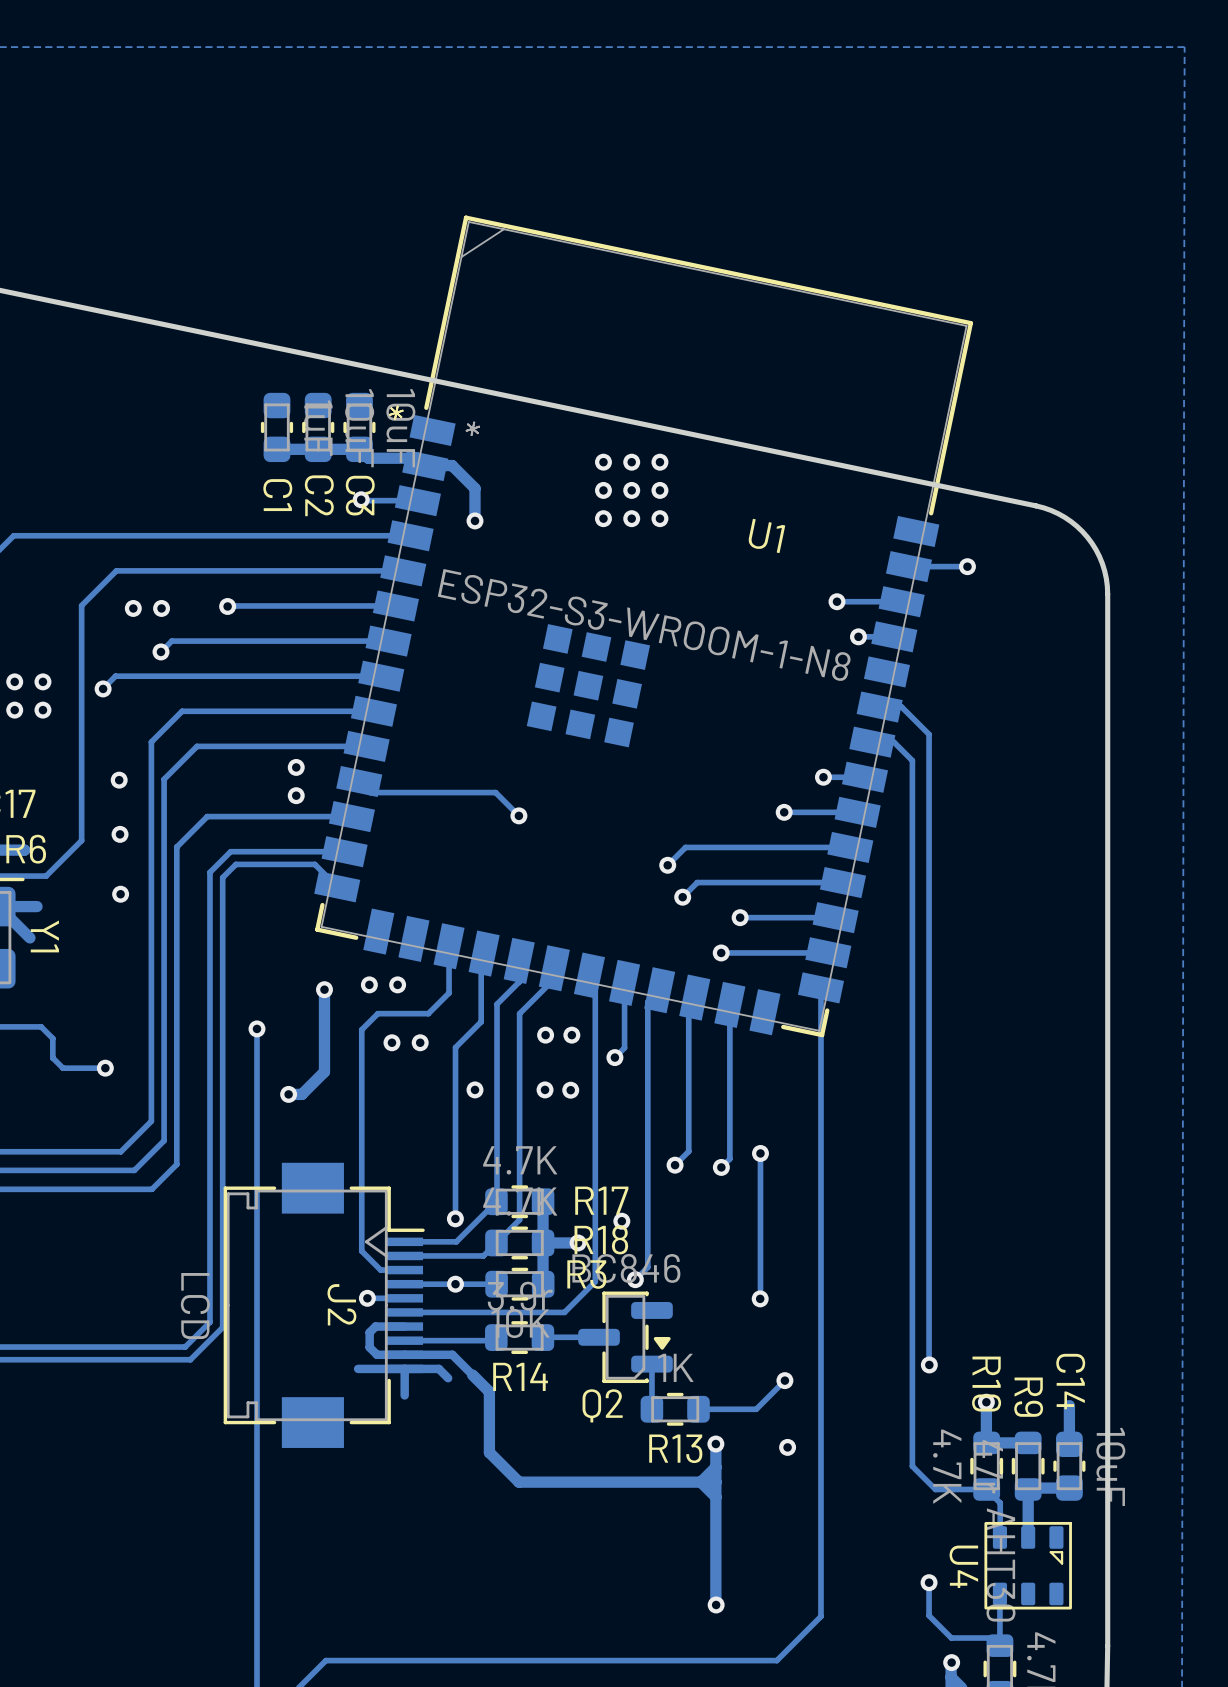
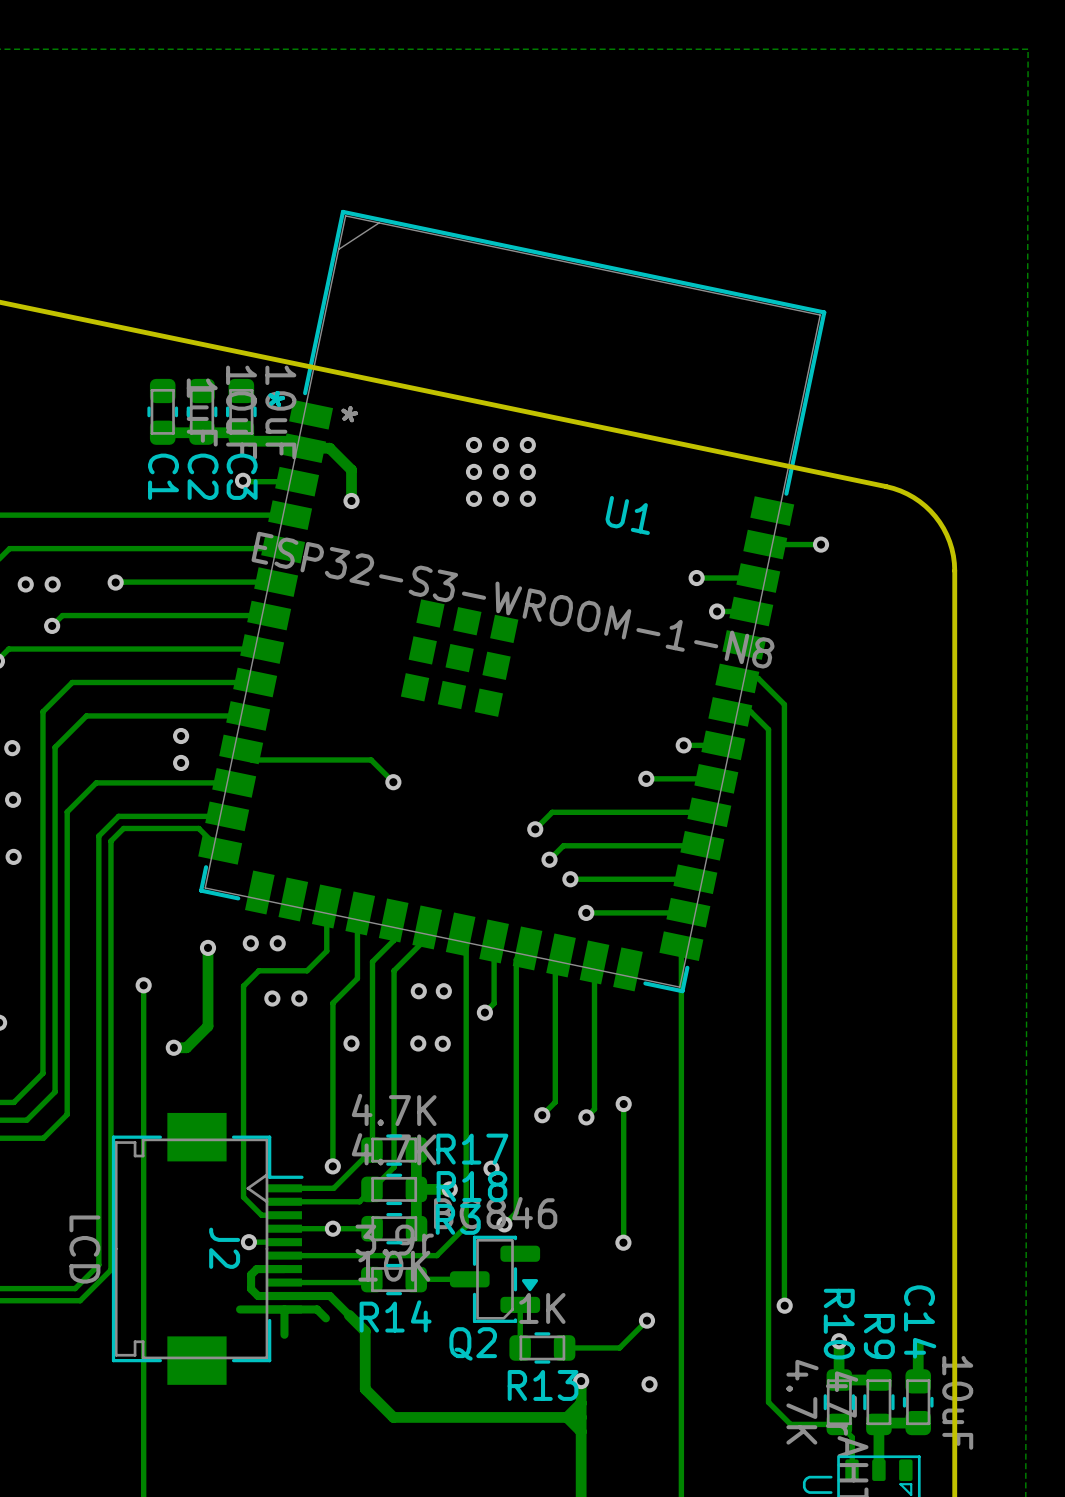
track: none -> (604, 879) (570, 879)
via position: (740, 917) -> (570, 879)

